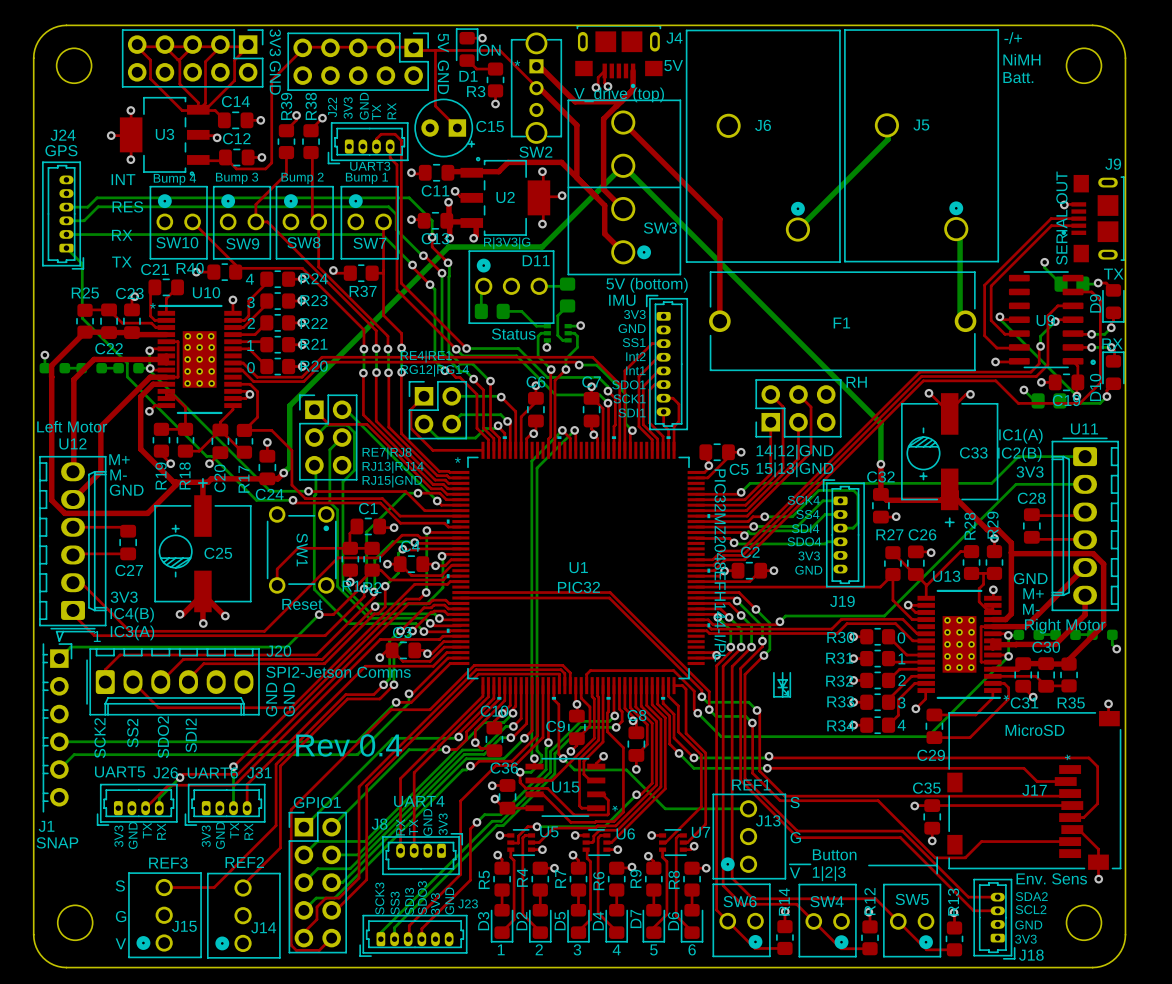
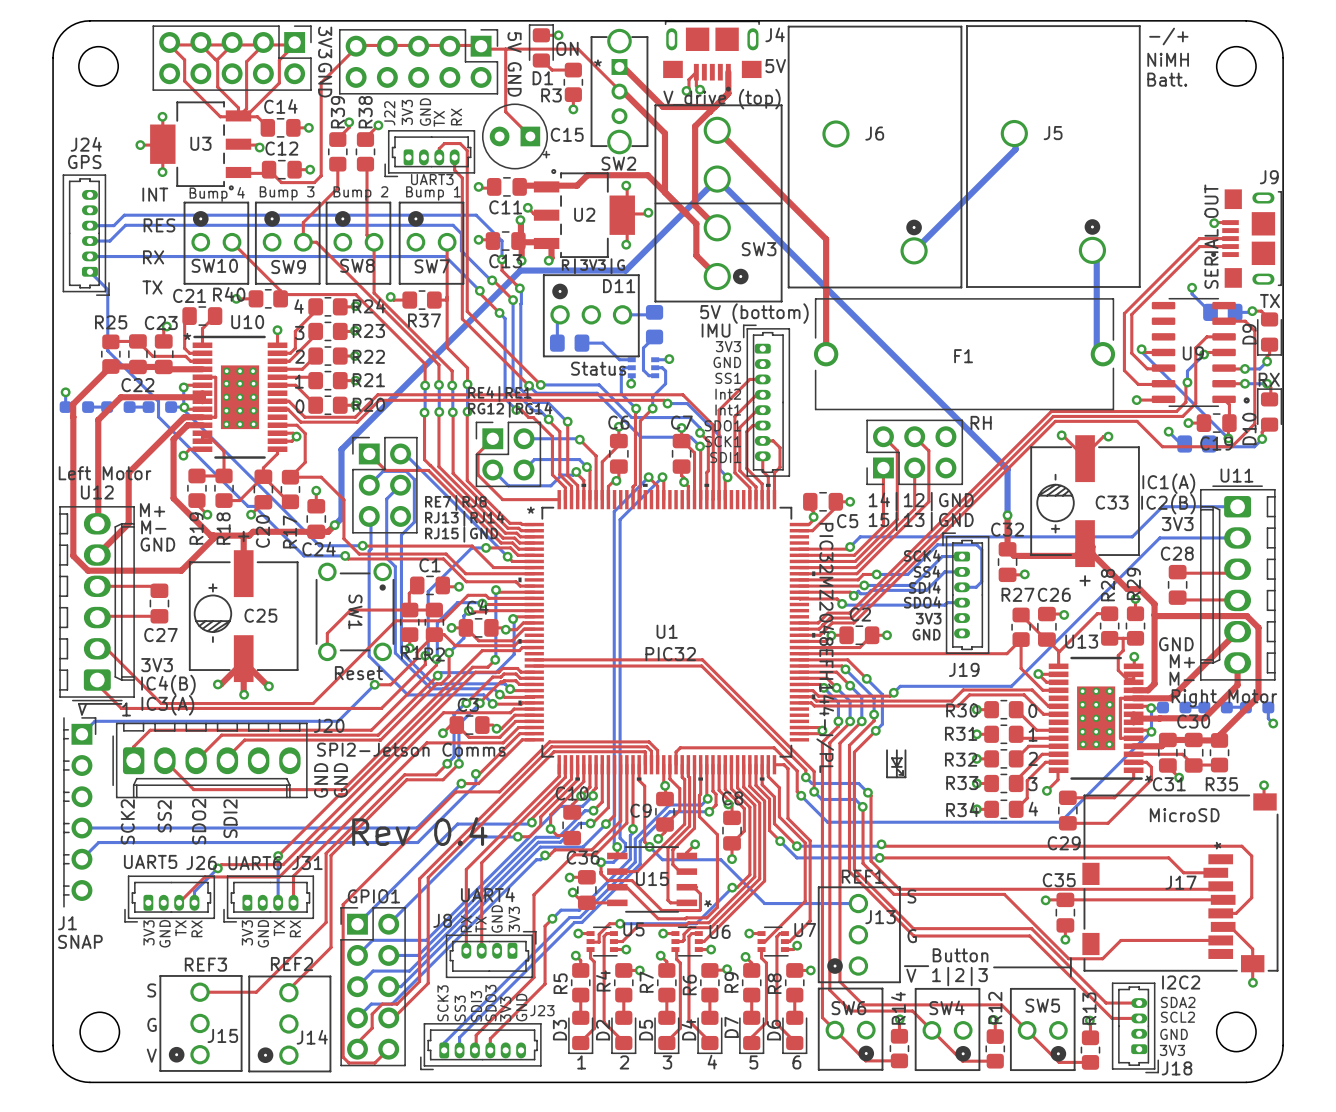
text: Env. Sens (1051, 878) -> I2C2 (1181, 982)

